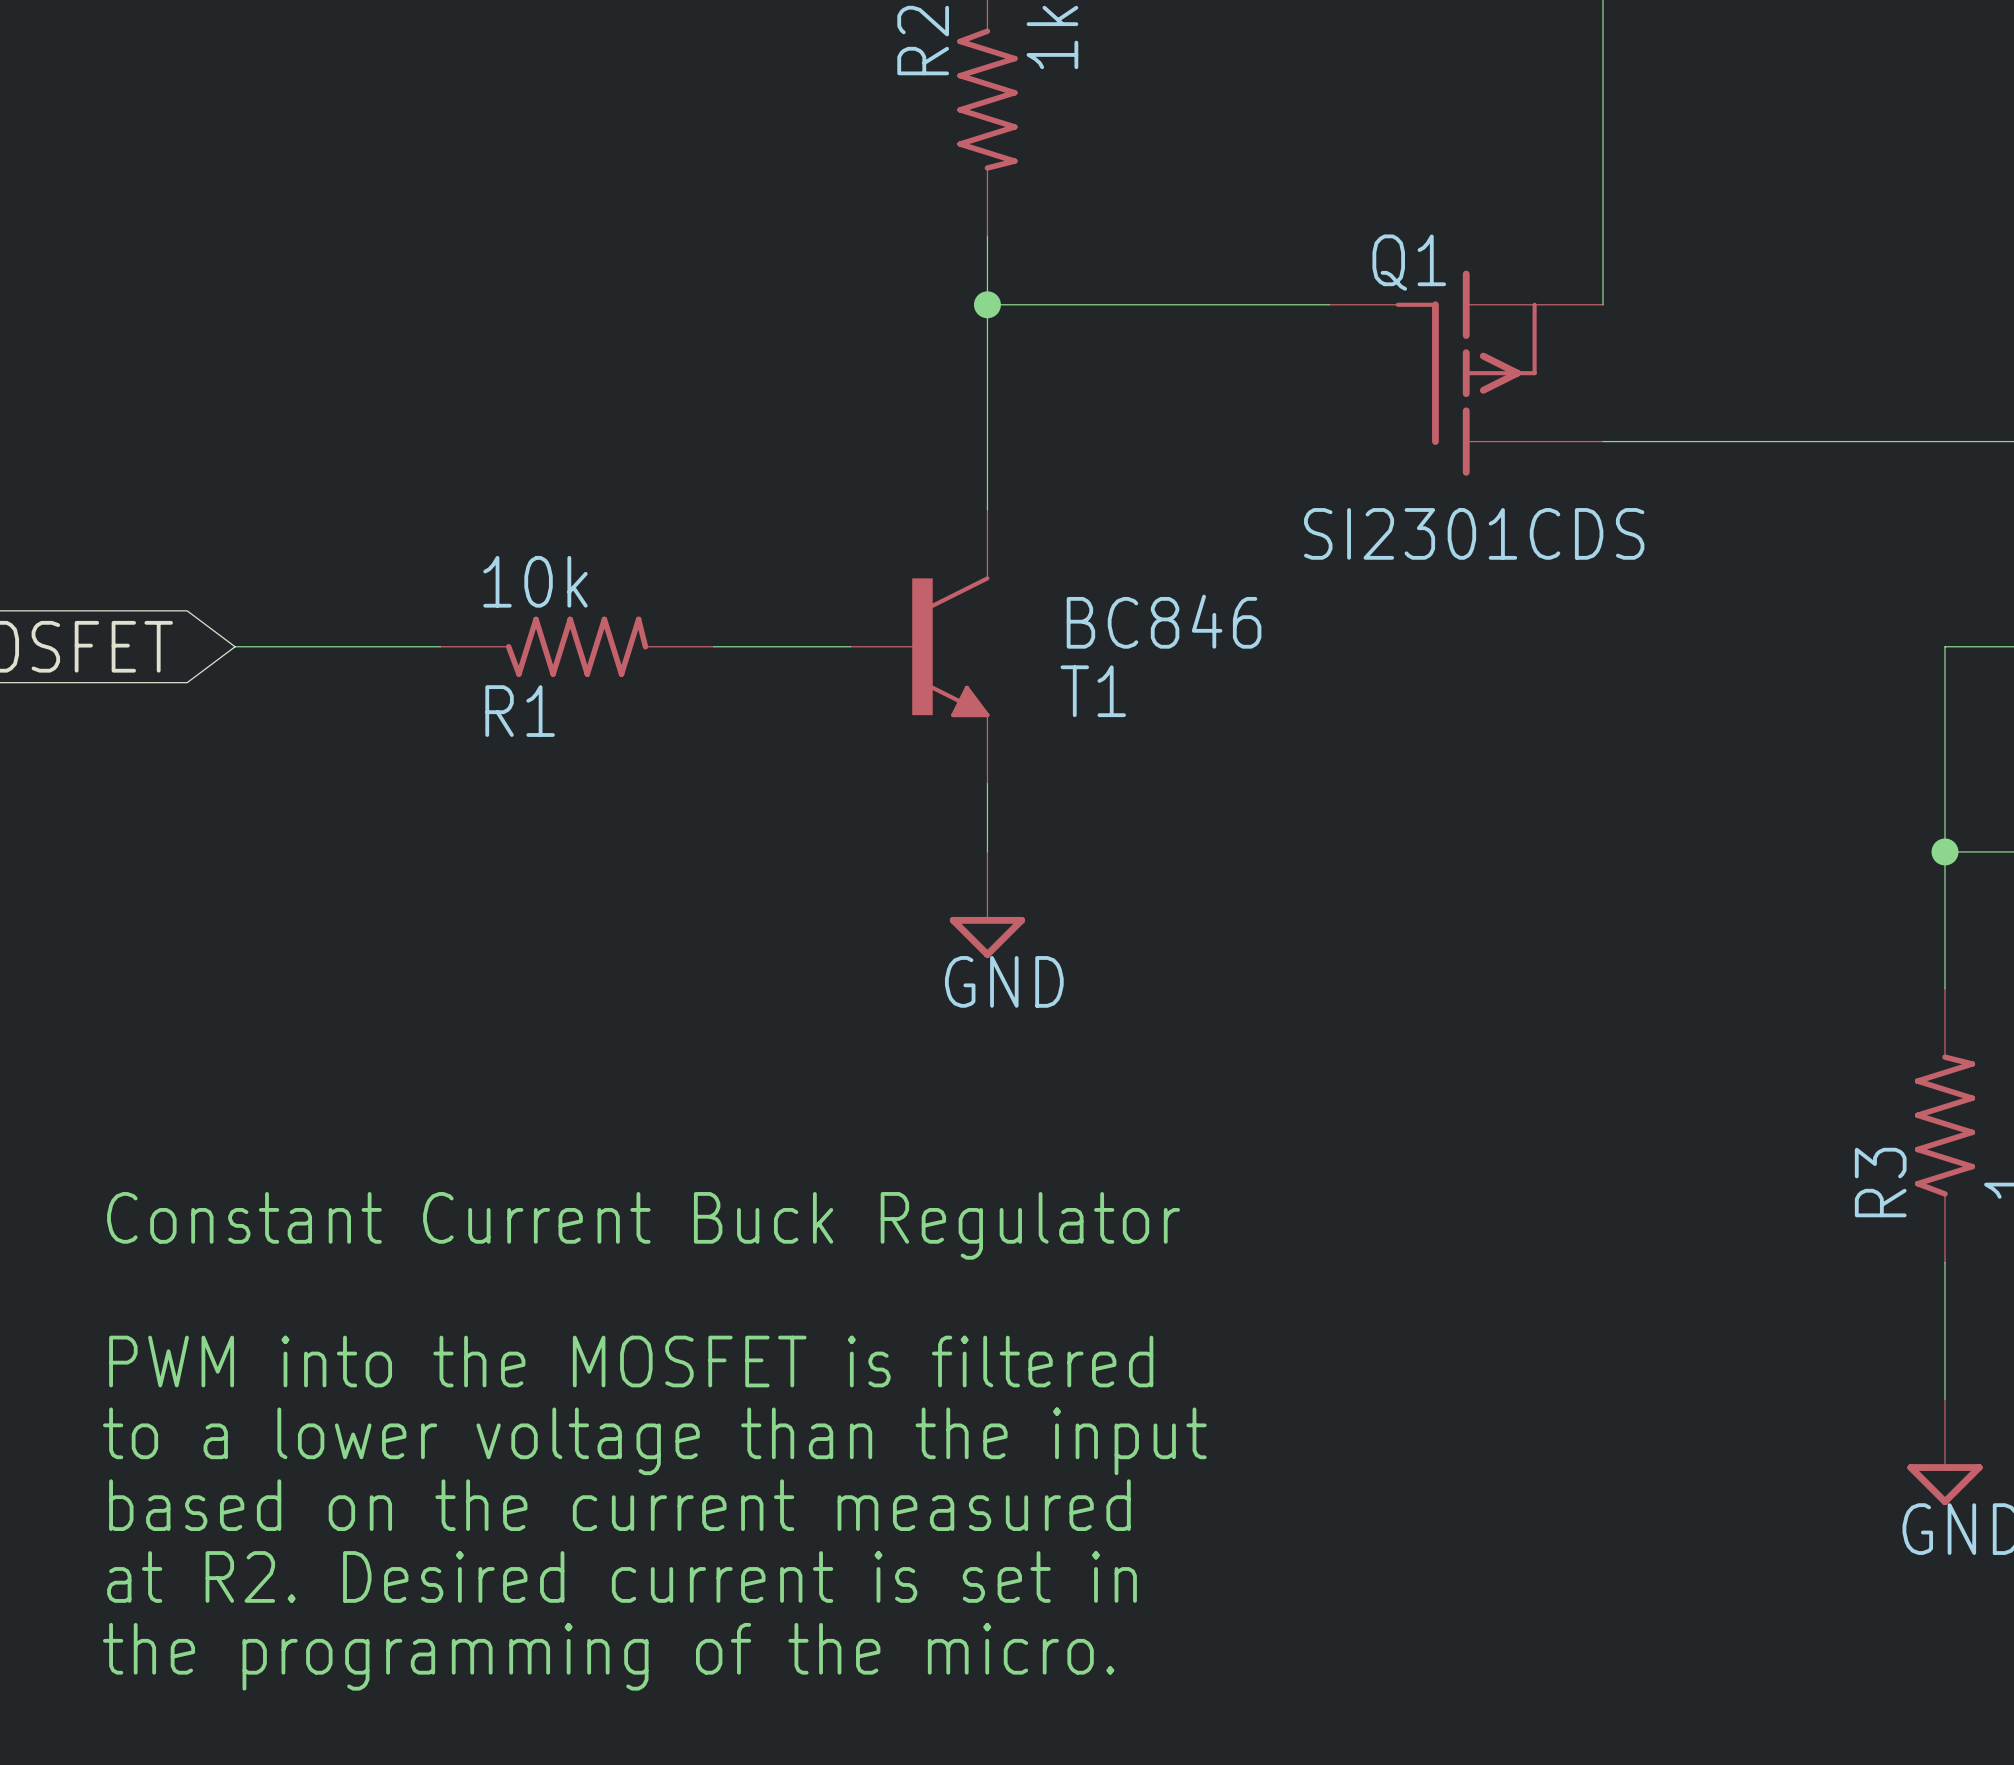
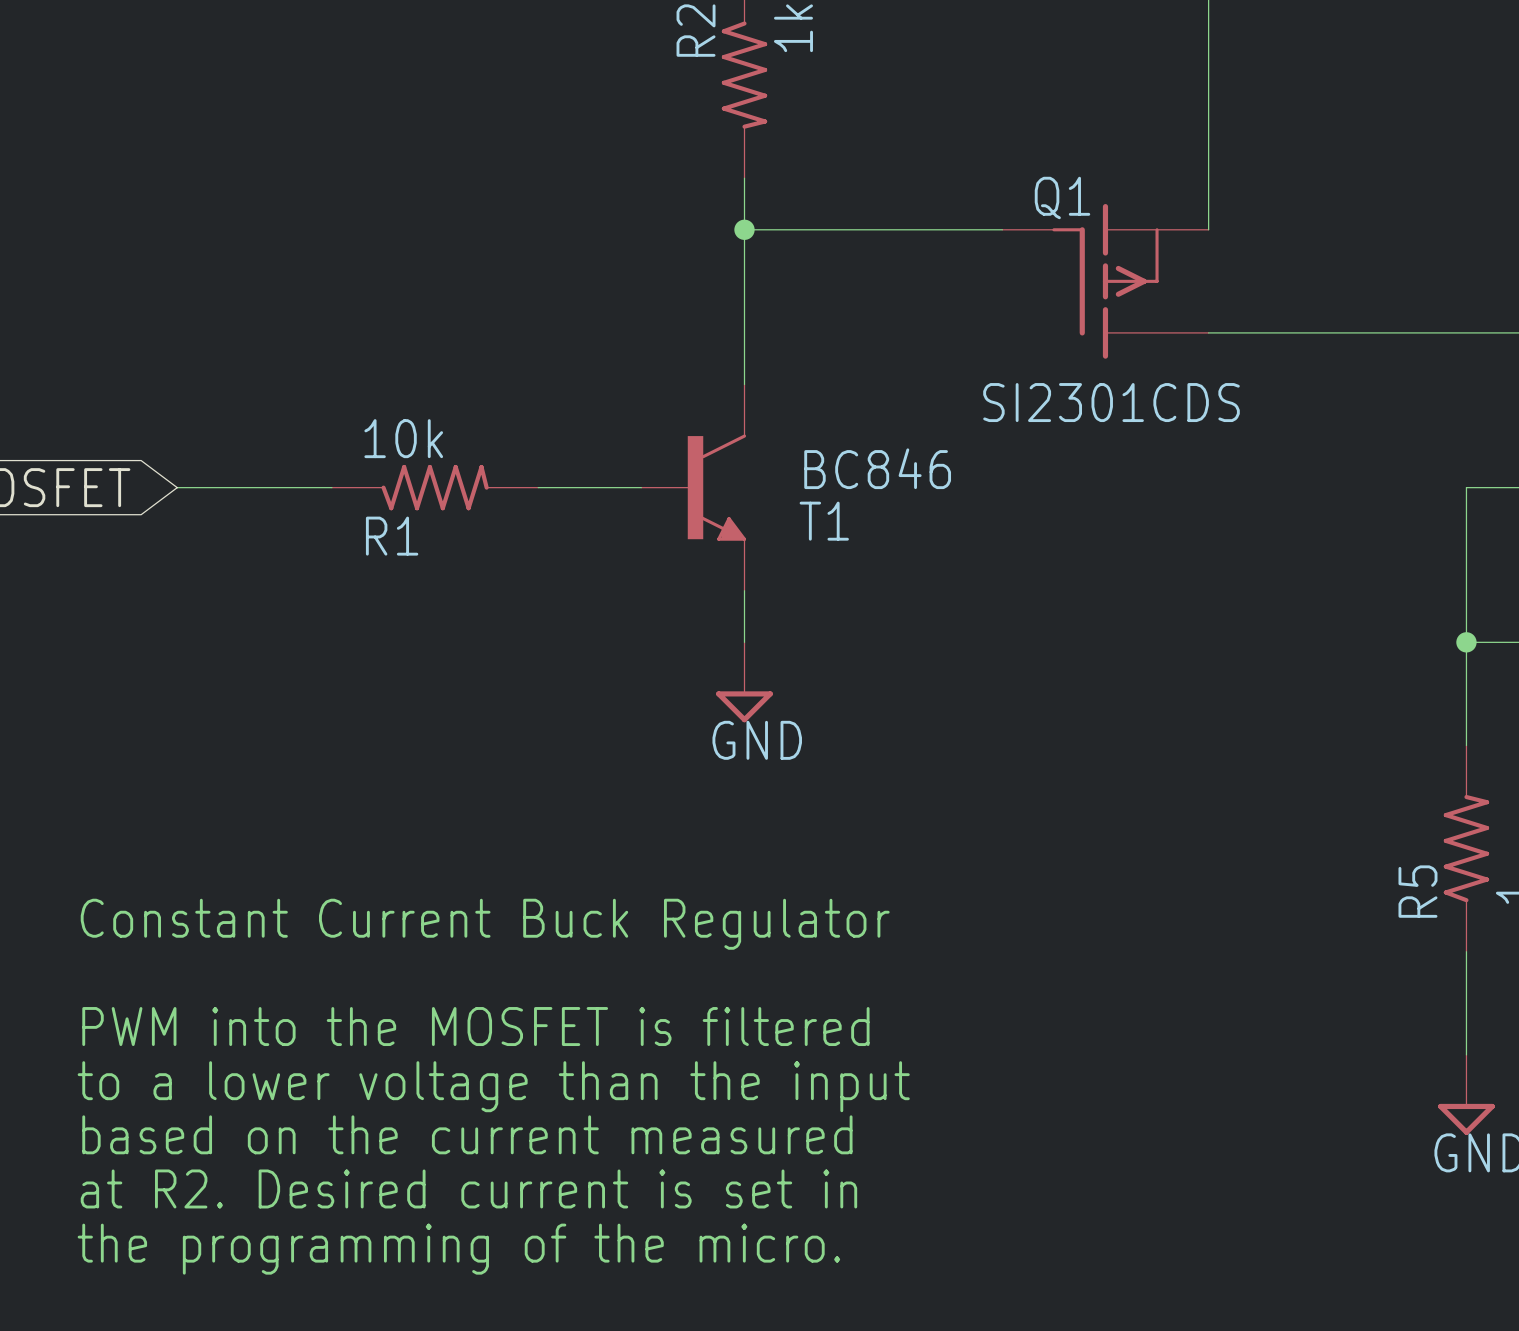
R3 name: R3 (1880, 1182) -> R5 (1417, 891)

